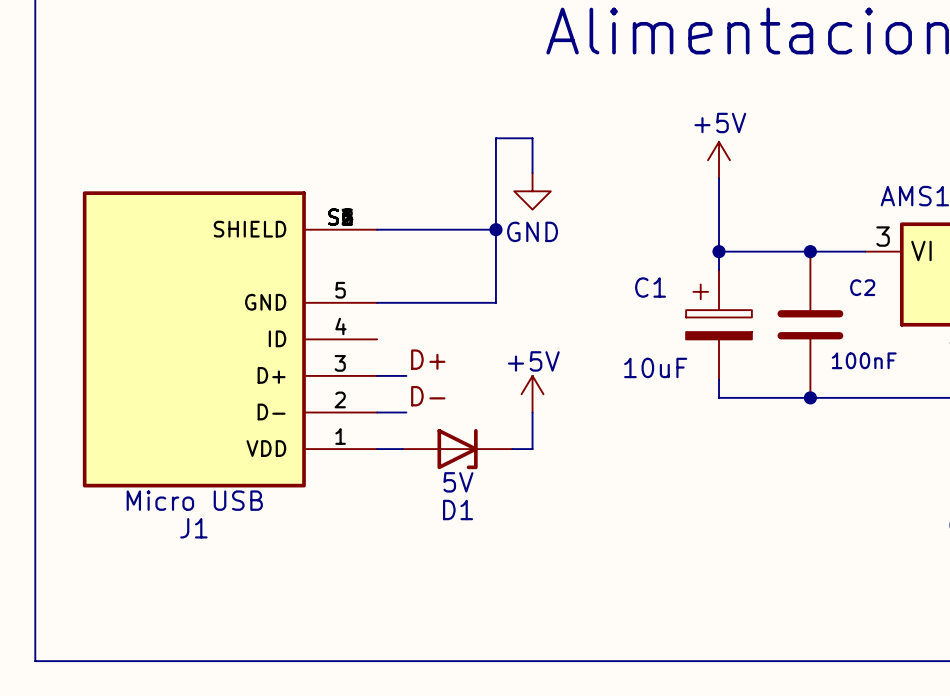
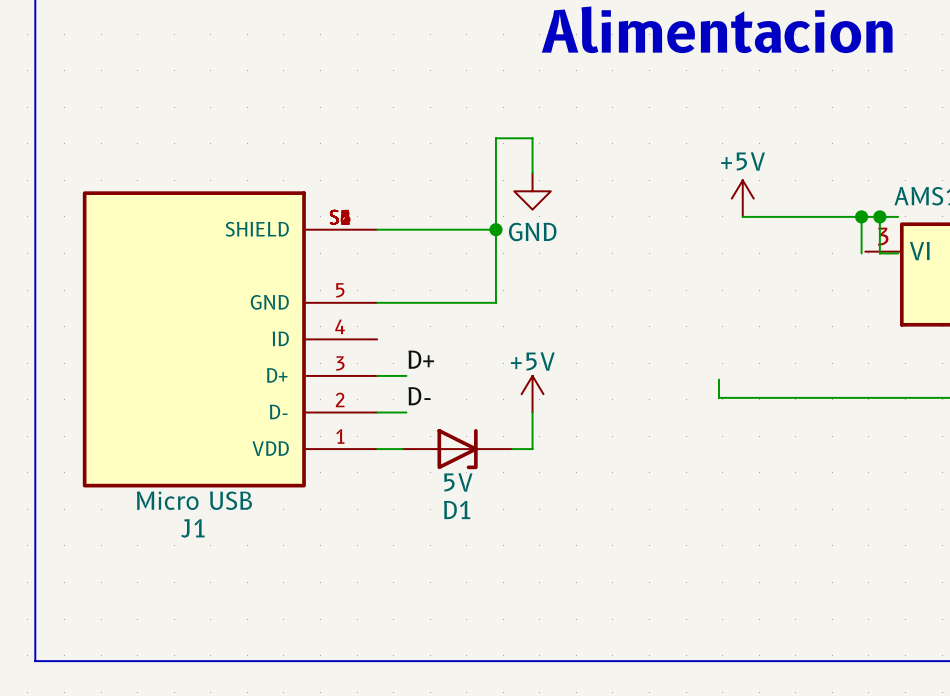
power symbol position: +5V (719, 160) -> +5V (742, 198)
wire: (719, 178) (719, 269) -> none
wire: none -> (742, 216) (898, 216)
wire: none -> (861, 216) (861, 253)
junction: none -> (861, 216)
wire: none -> (879, 216) (879, 253) (898, 253)
junction: none -> (879, 216)
wire: (719, 251) (865, 251) -> none
junction: (719, 251) -> none
junction: (810, 251) -> none
C1: 10uF (719, 324) -> none
C2: 100nF (810, 324) -> none
junction: (810, 397) -> none

